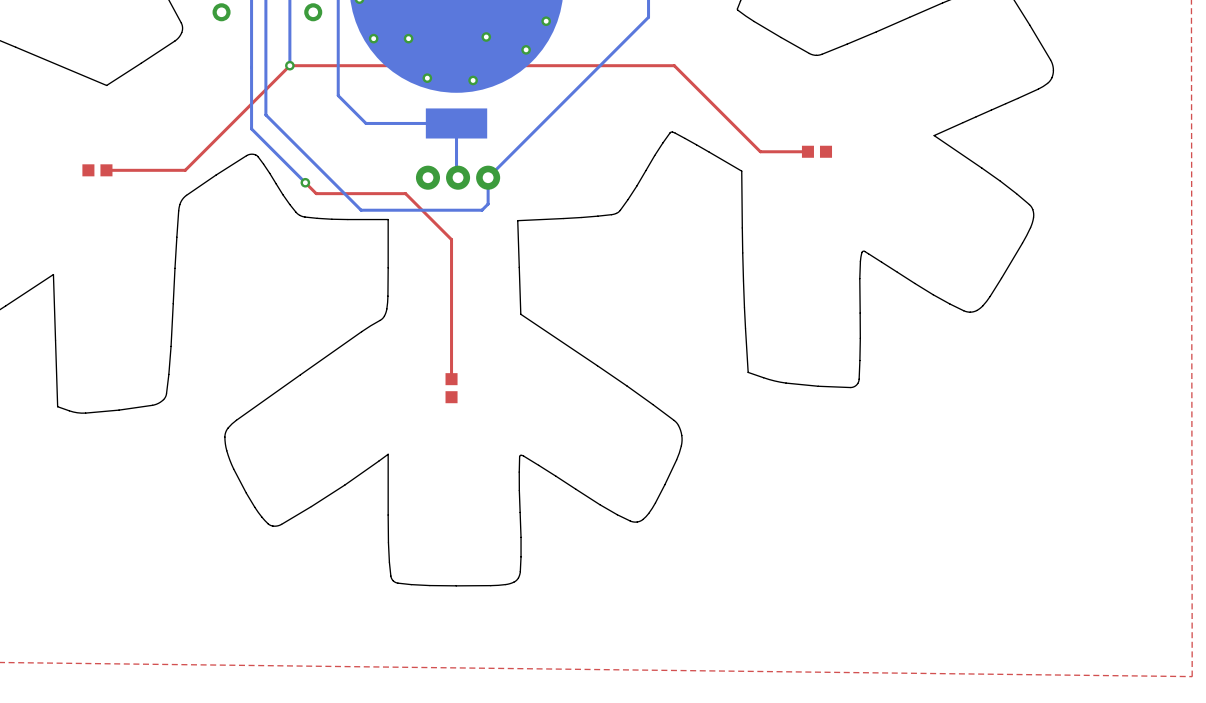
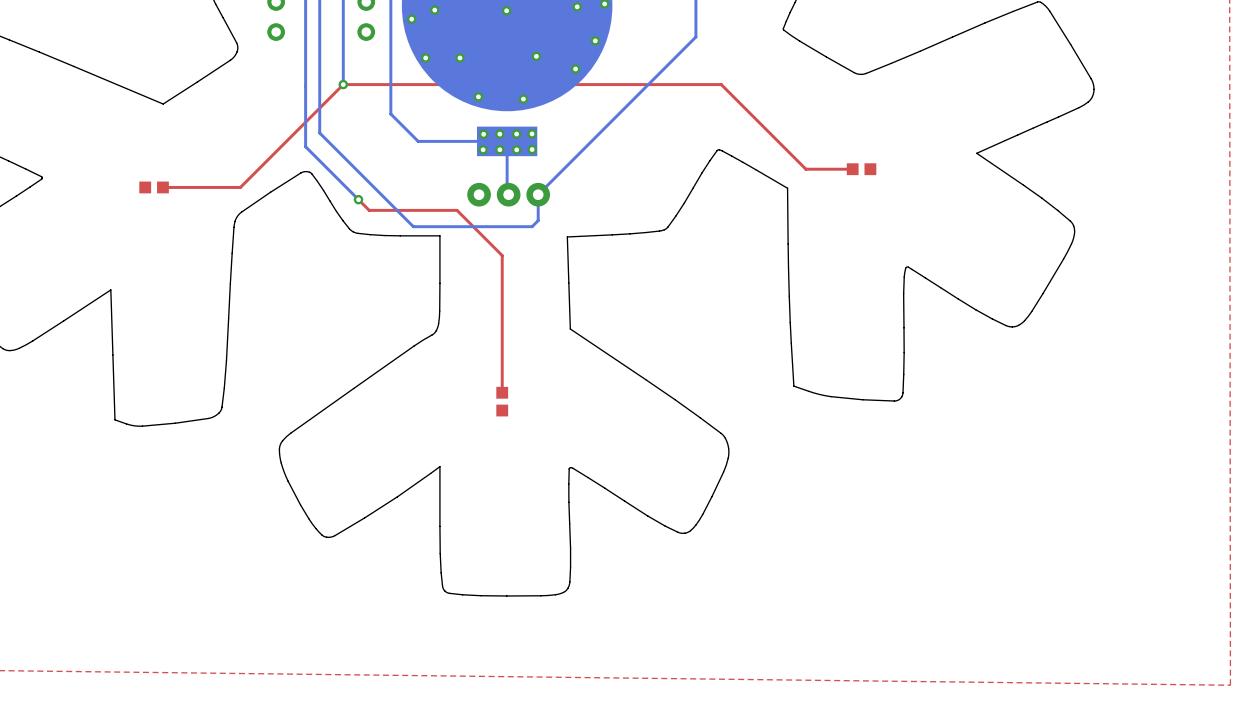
via: none -> (532, 133)
via: none -> (483, 134)
via: none -> (499, 134)
via: none -> (516, 134)
via: none -> (499, 149)
via: none -> (532, 149)
via: none -> (483, 149)
via: none -> (516, 149)

